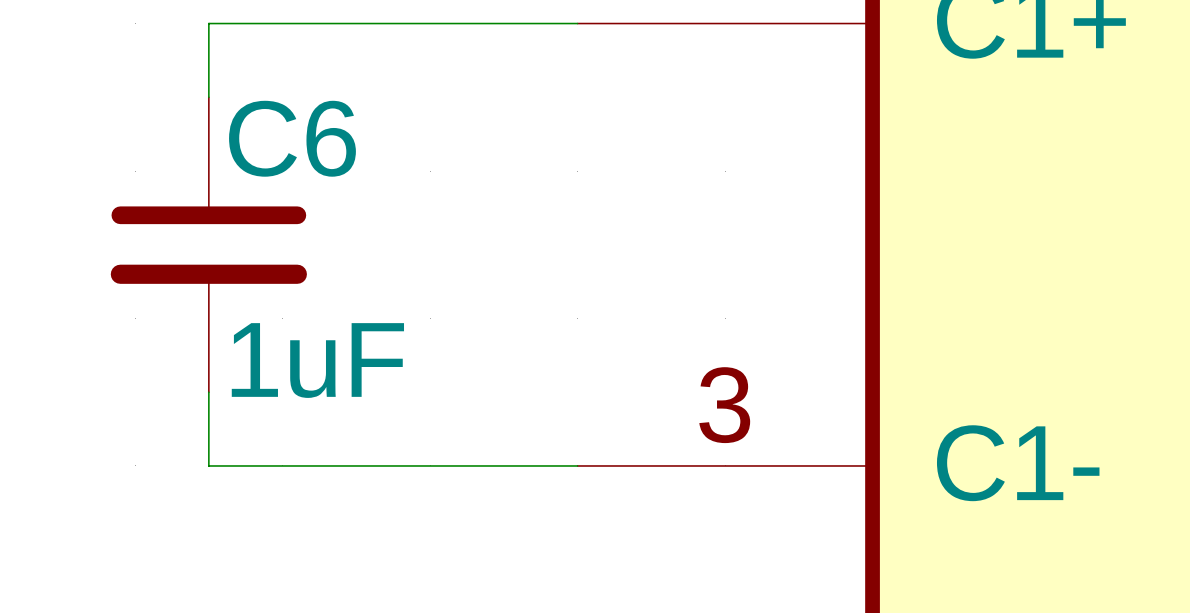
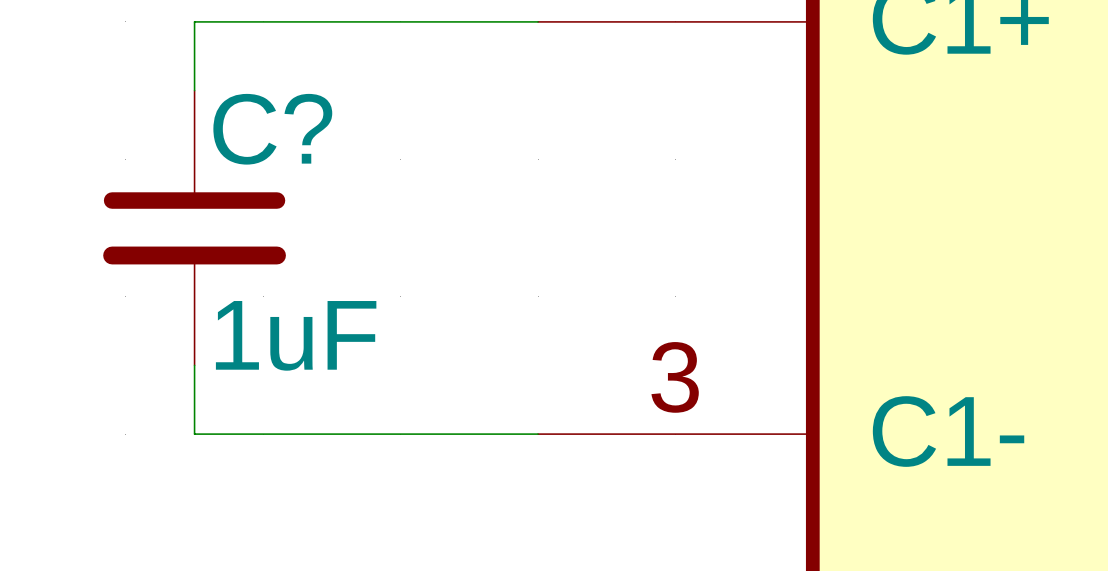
C6 name: C6 (292, 138) -> C? (272, 129)

